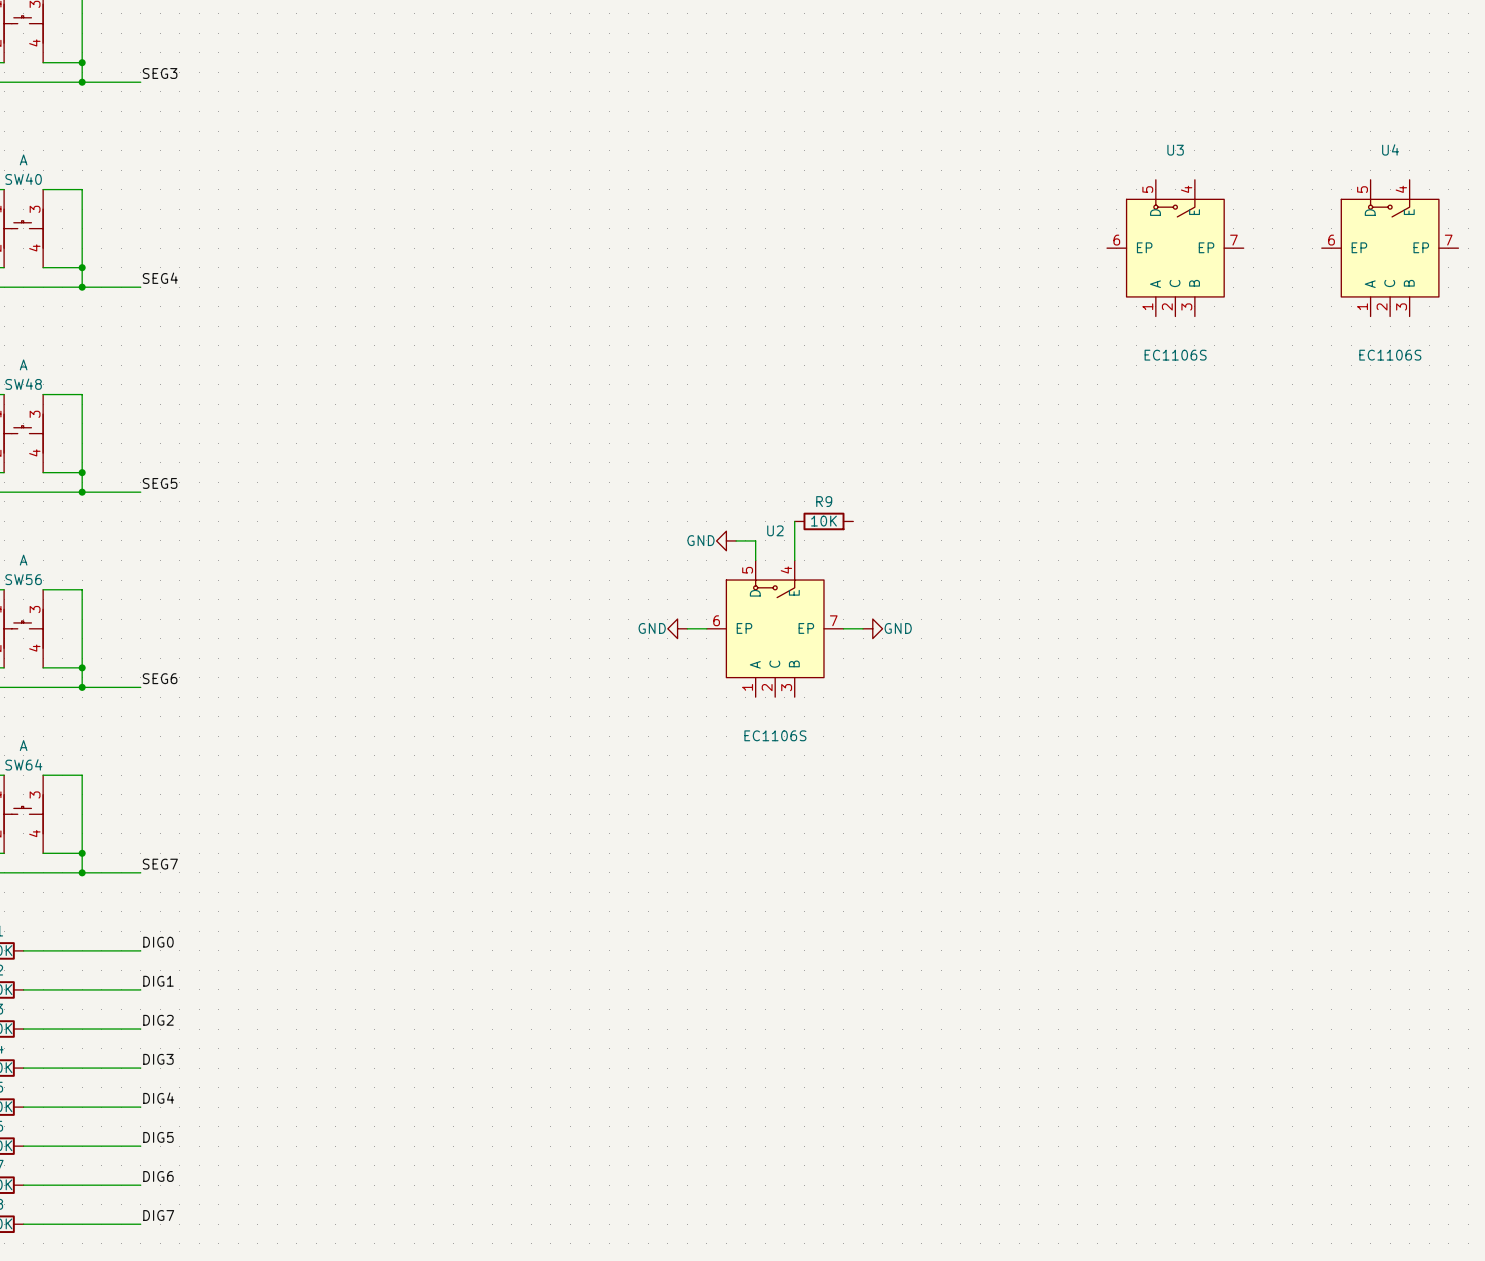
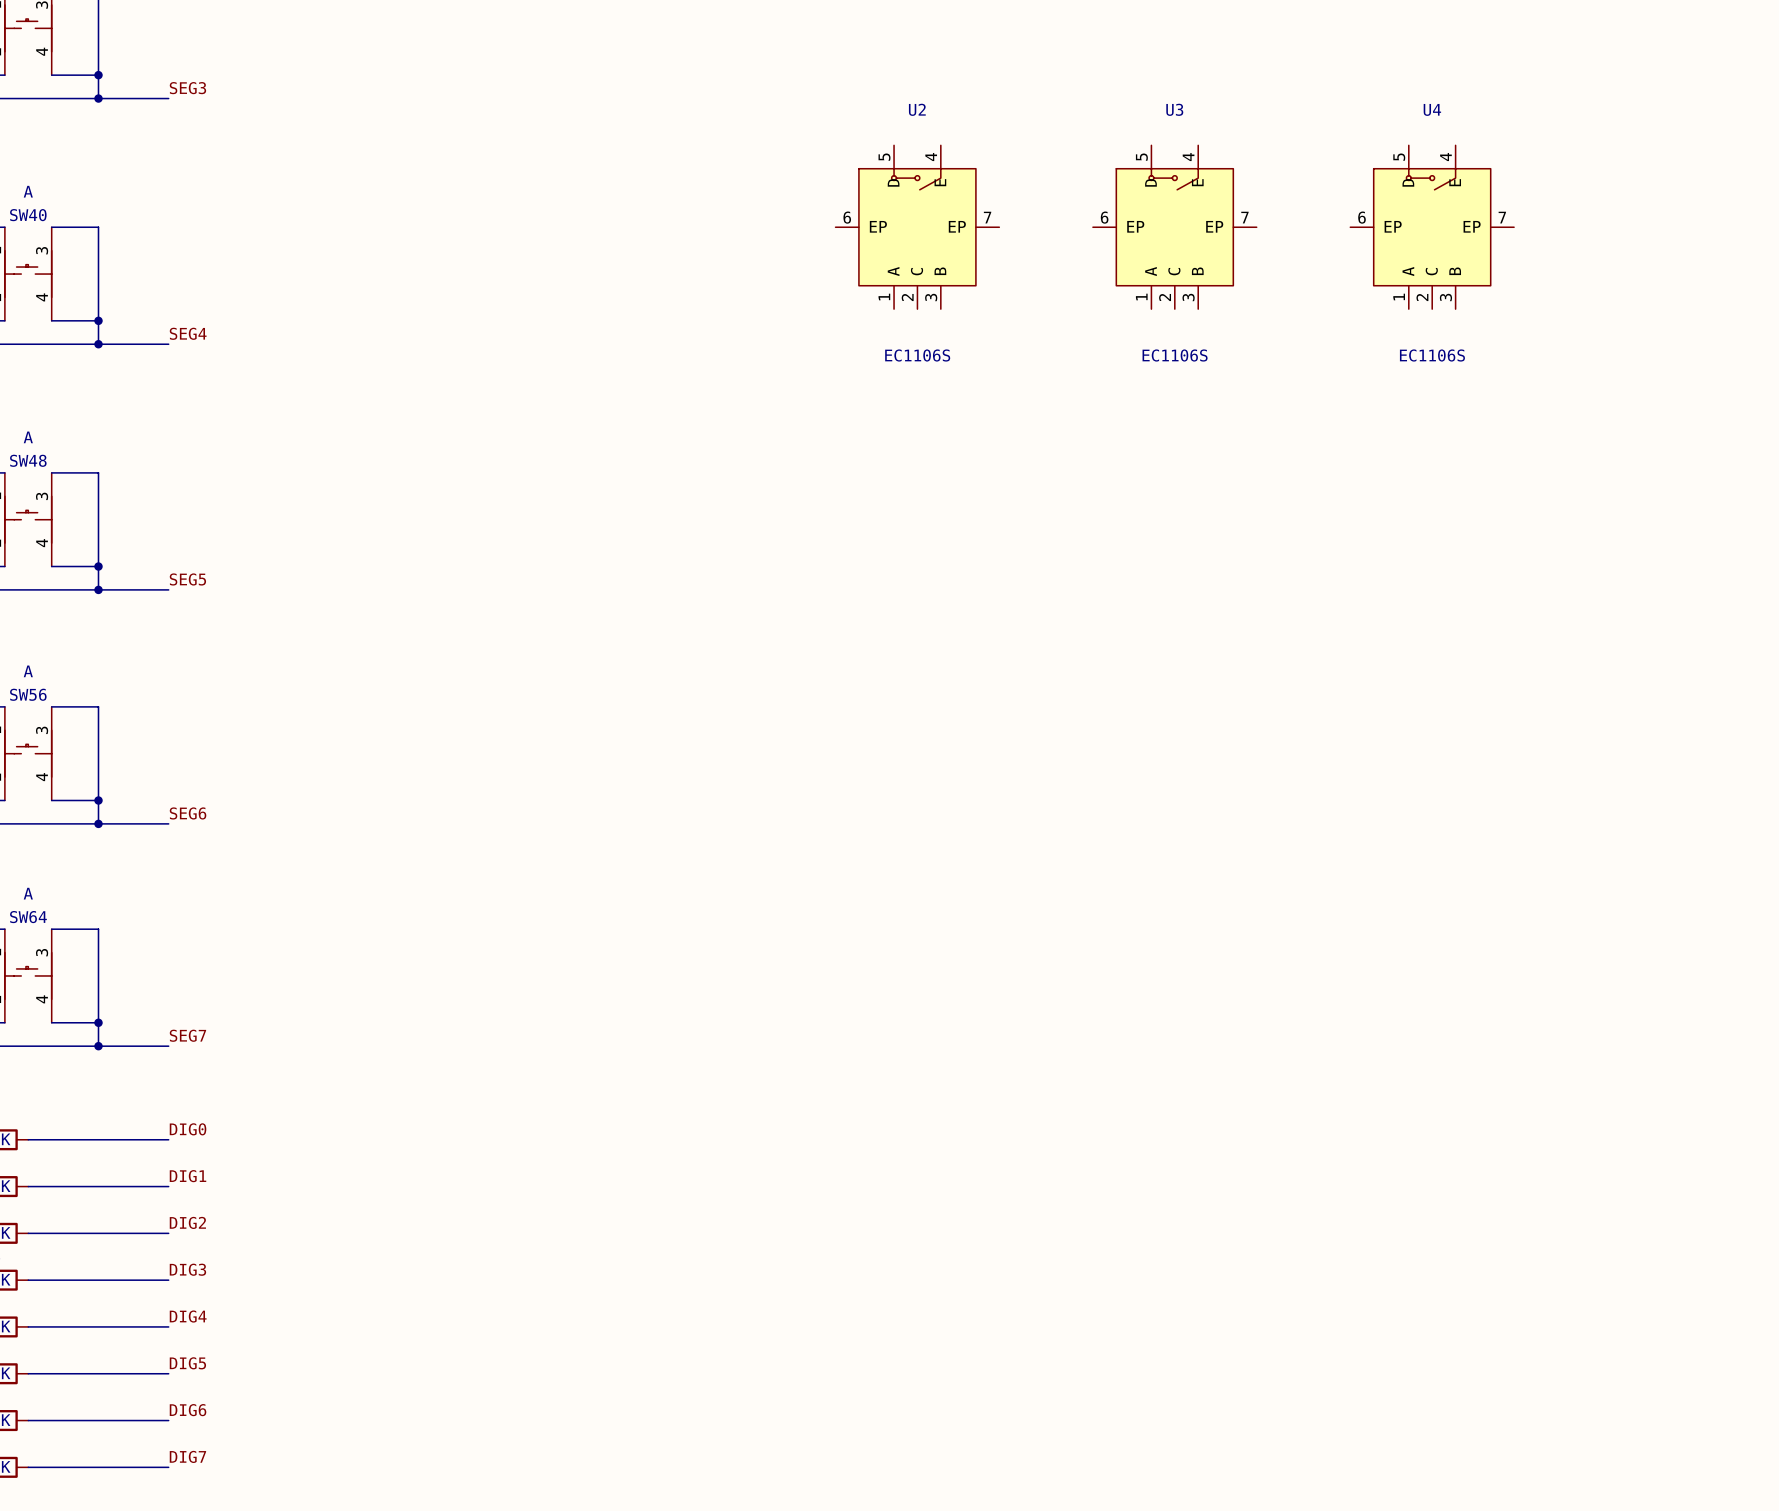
U3 position: (1175, 248) -> (1174, 227)
U4 position: (1390, 248) -> (1432, 227)
wire: (794, 521) (794, 560) -> none
R9: 10K (823, 521) -> none
power symbol: GND (726, 540) -> none
wire: (736, 540) (755, 540) (755, 560) -> none
power symbol: GND (677, 628) -> none
wire: (687, 628) (706, 628) -> none
U2 position: (775, 628) -> (917, 227)
wire: (843, 628) (863, 628) -> none
power symbol: GND (872, 628) -> none

